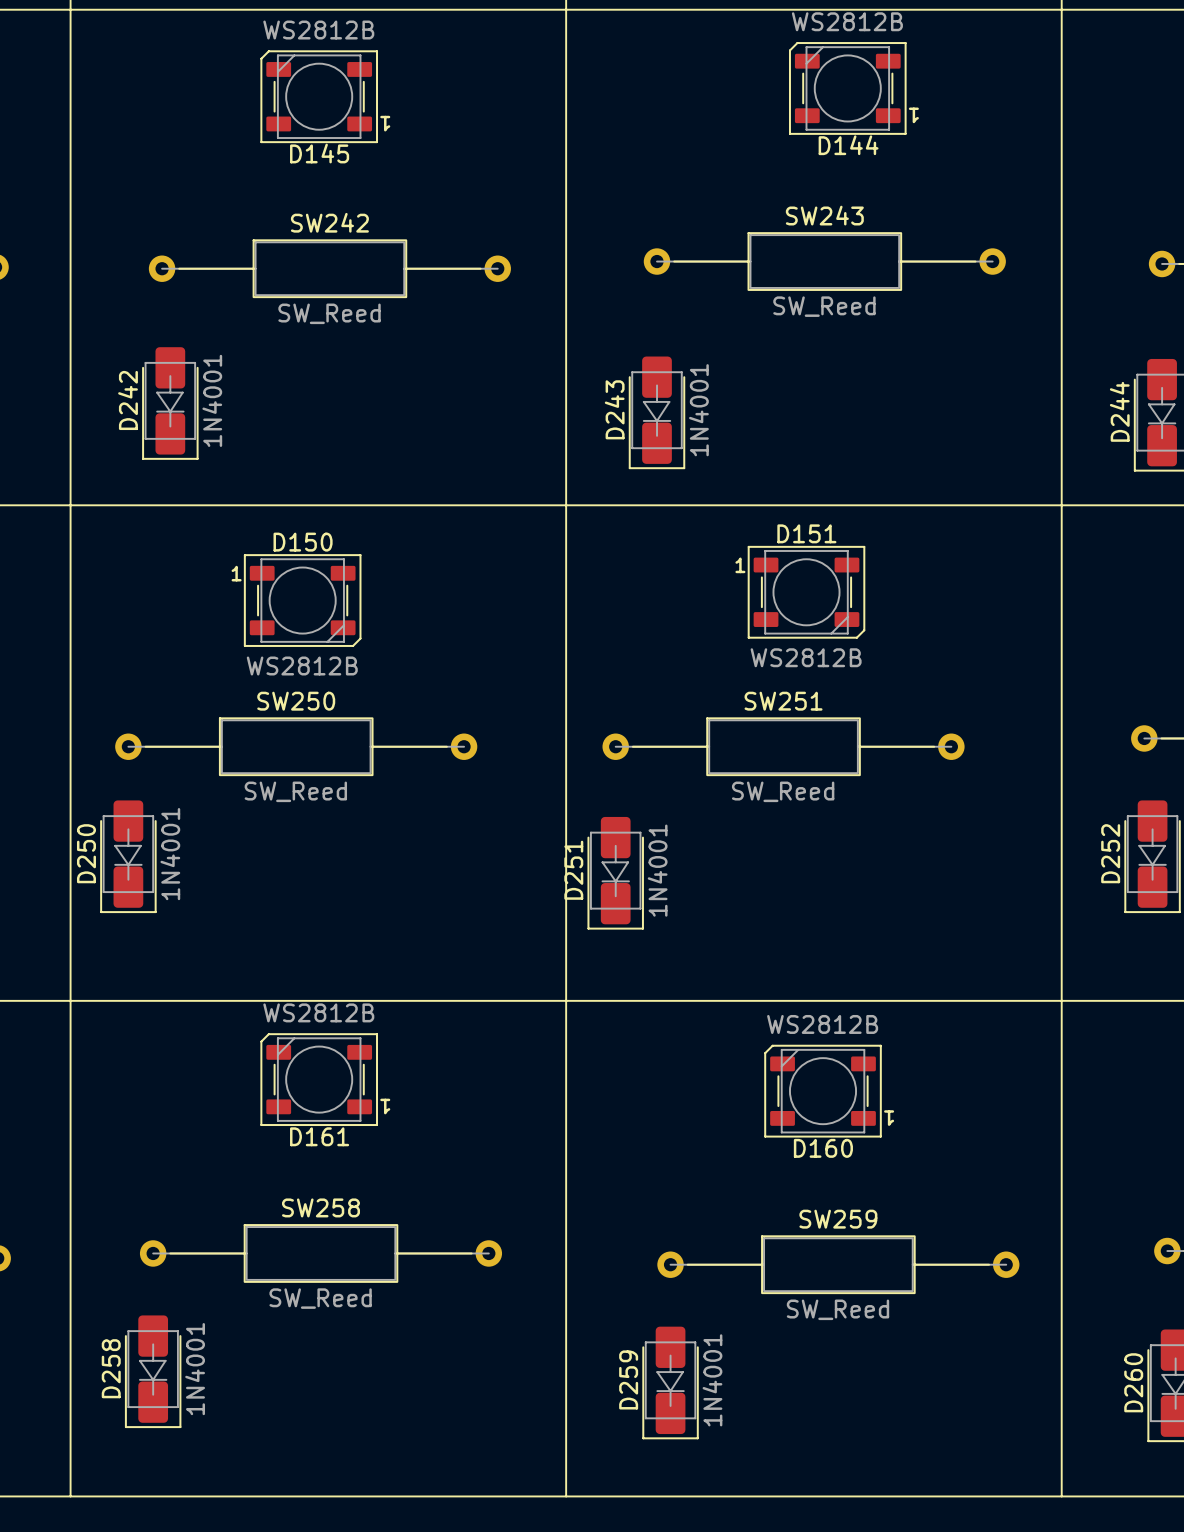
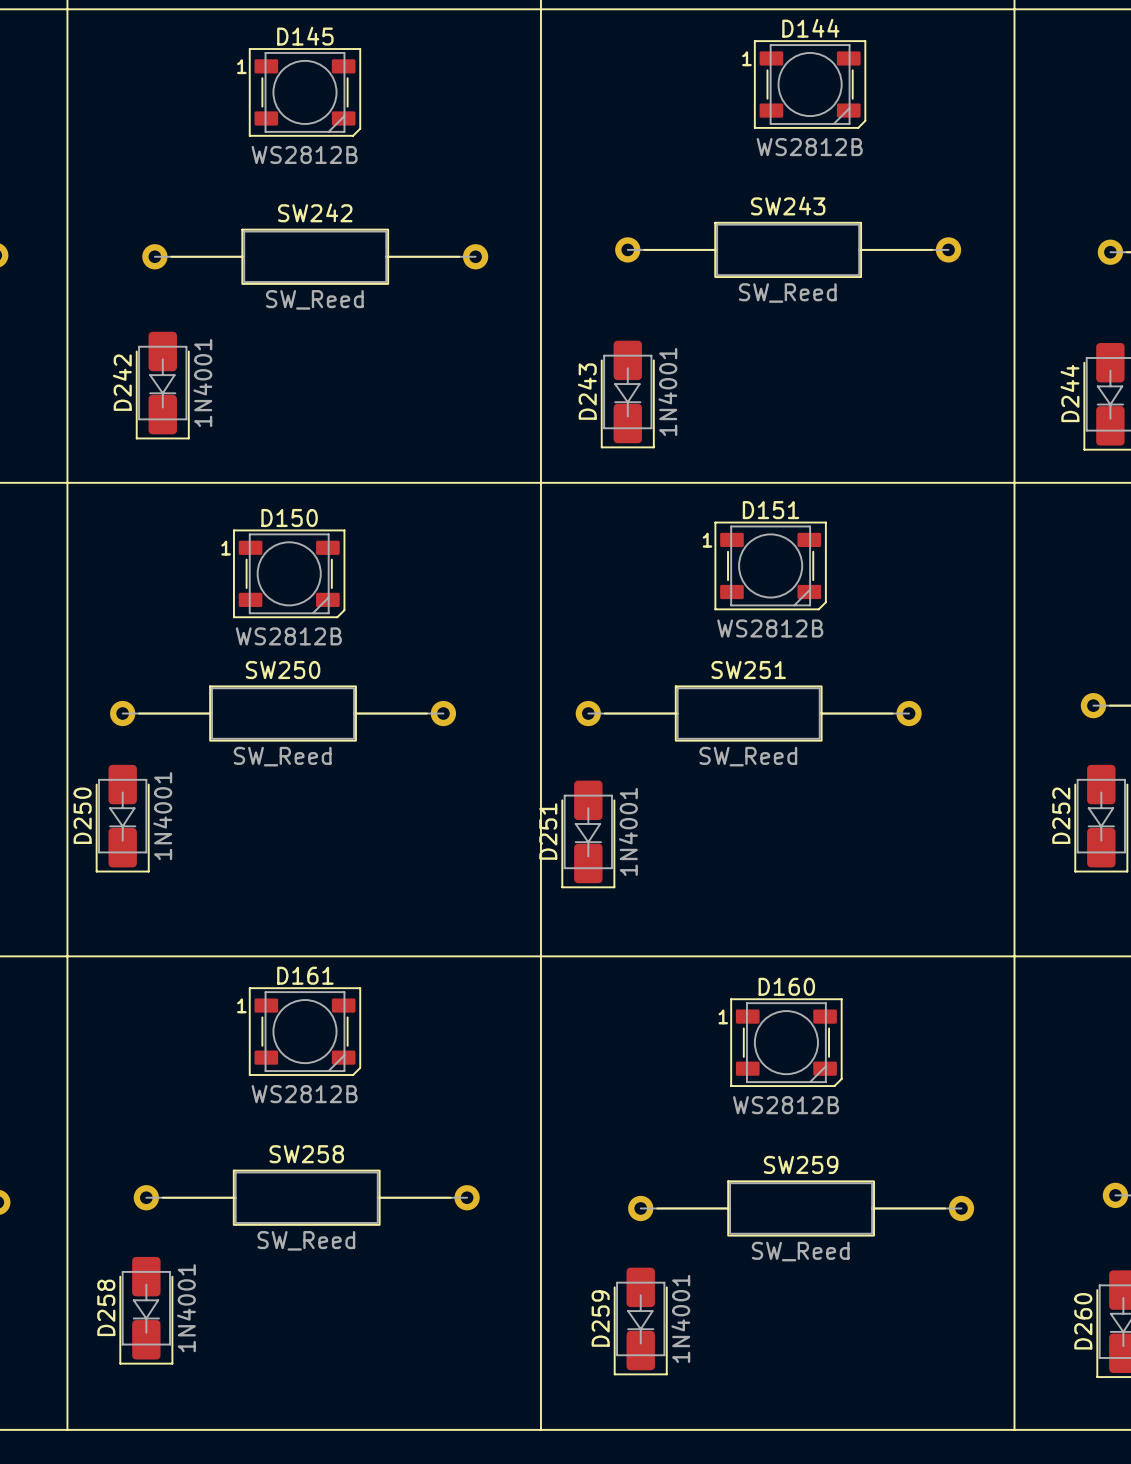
D144 rotation: 0° (847, 88) -> 180° (810, 84)
D145 rotation: 0° (319, 96) -> 180° (304, 92)
D161 rotation: 0° (319, 1079) -> 180° (304, 1031)
D160 rotation: 0° (823, 1091) -> 180° (786, 1042)

